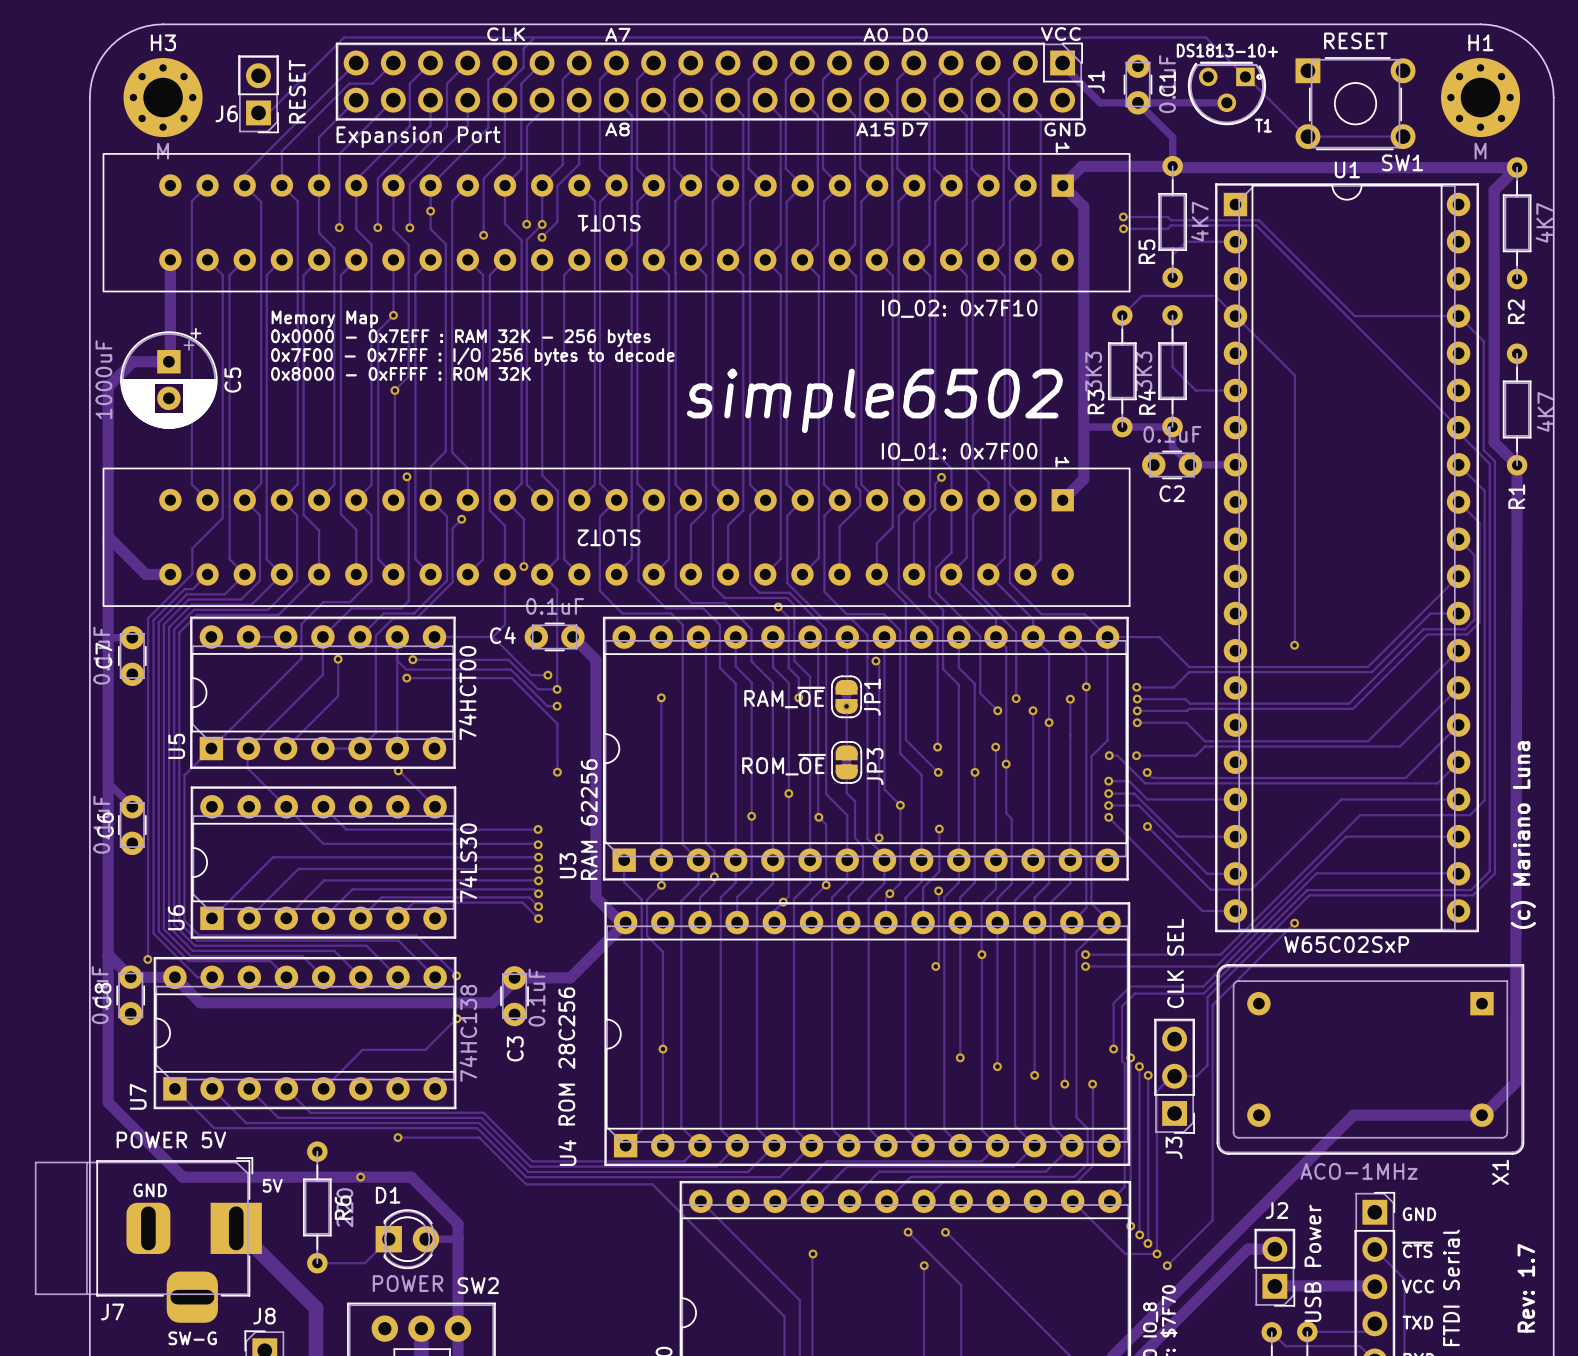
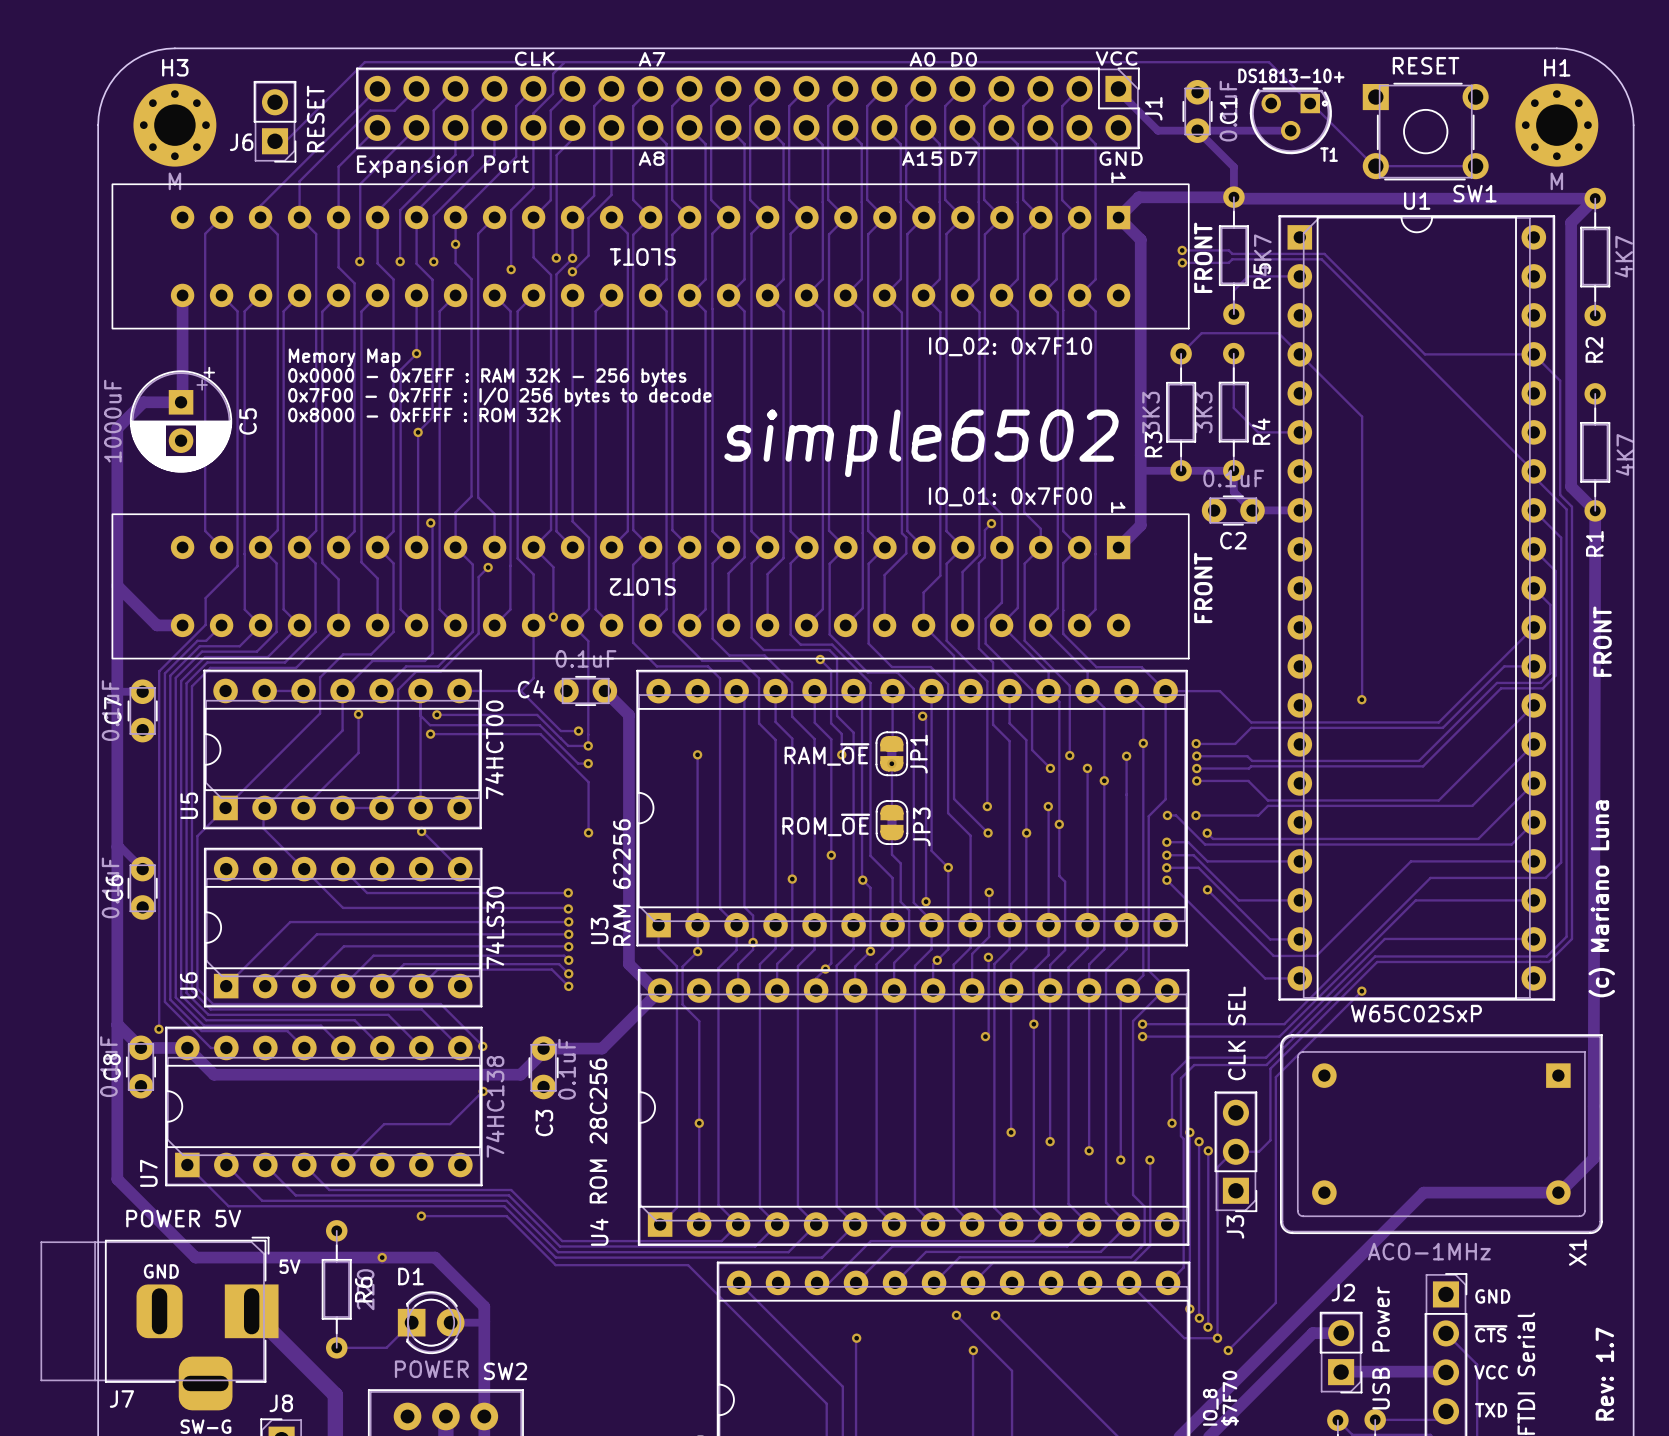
text: none -> FRONT (1203, 257)
R5 name position: R5 (1146, 251) -> R5 (1262, 276)
R4 name position: R4 (1147, 402) -> R4 (1261, 431)
text: none -> FRONT (1203, 587)
text: none -> FRONT (1602, 641)

